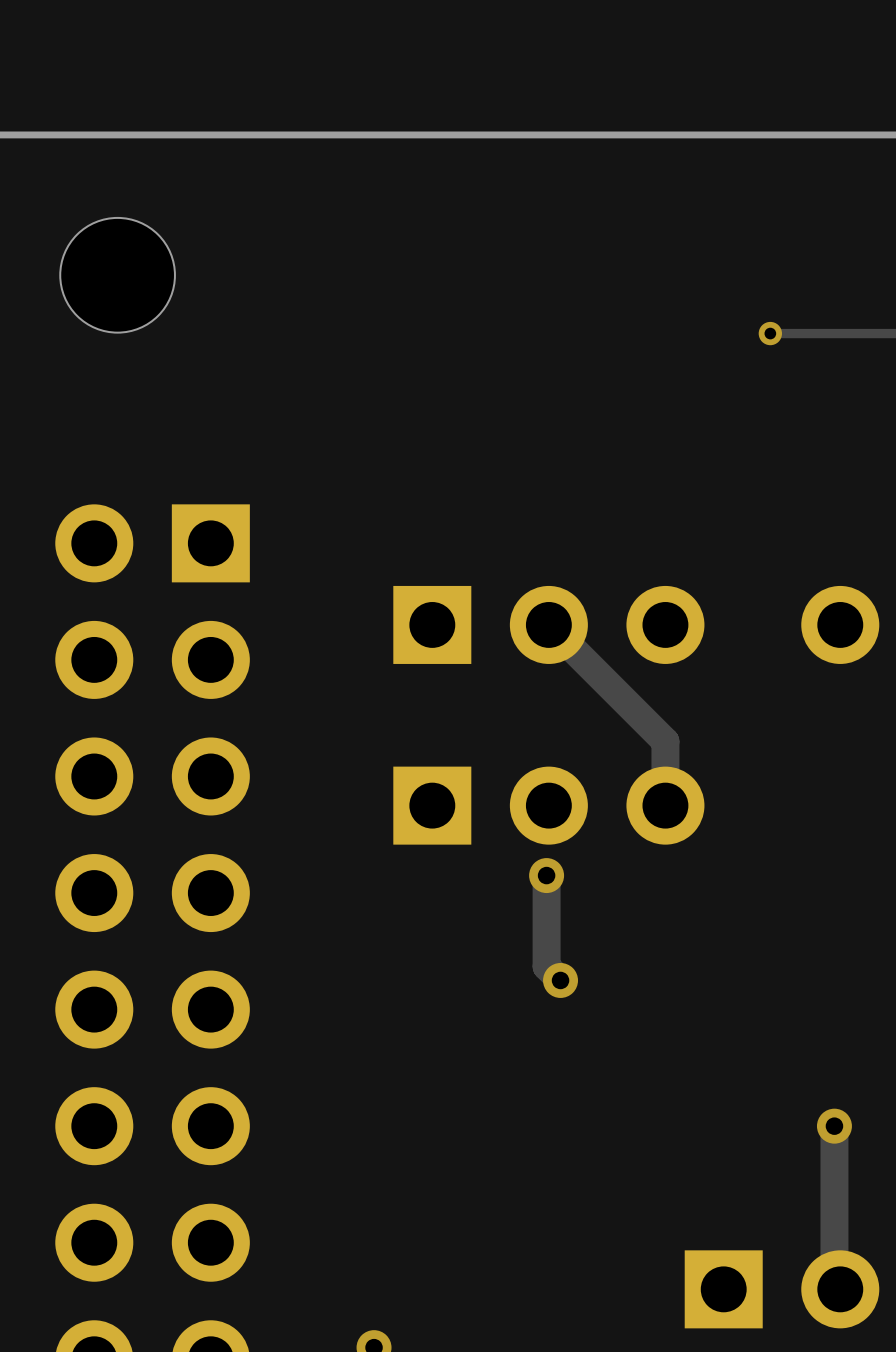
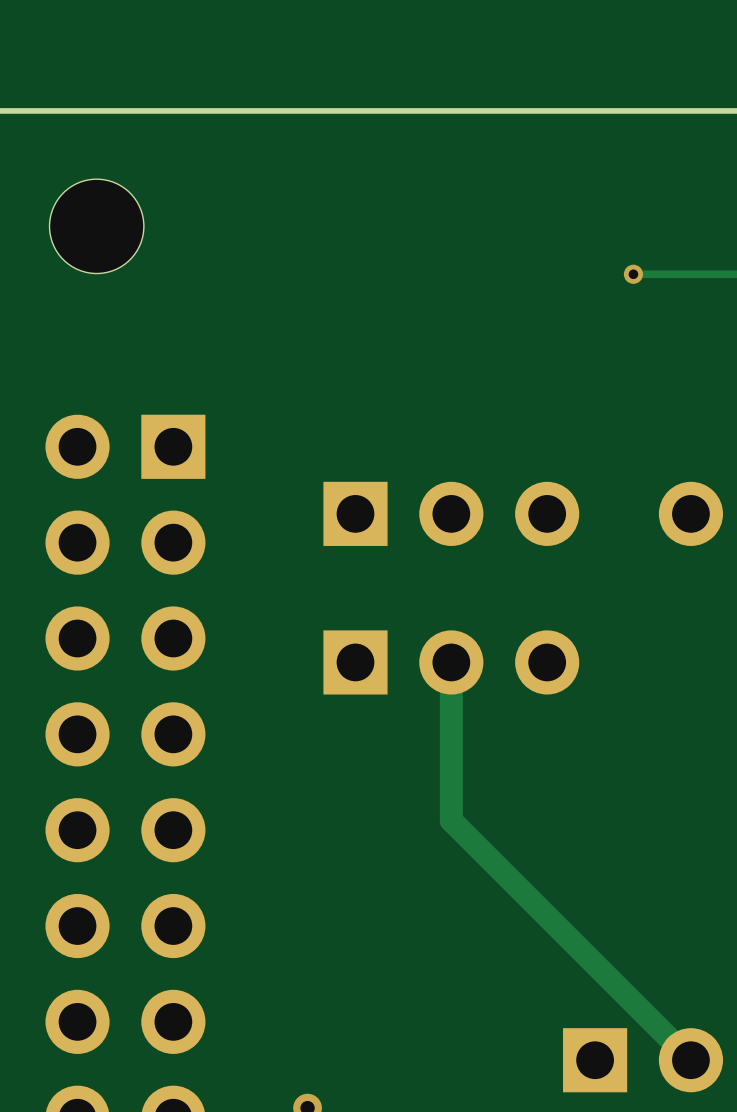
track: (548, 624) (665, 741) (665, 805) -> none
track: (546, 875) (546, 966) (560, 980) -> none
via: (546, 875) -> none
via: (560, 980) -> none
track: (834, 1126) (834, 1283) -> (451, 662) (451, 820) (686, 1055)
via: (834, 1126) -> none

